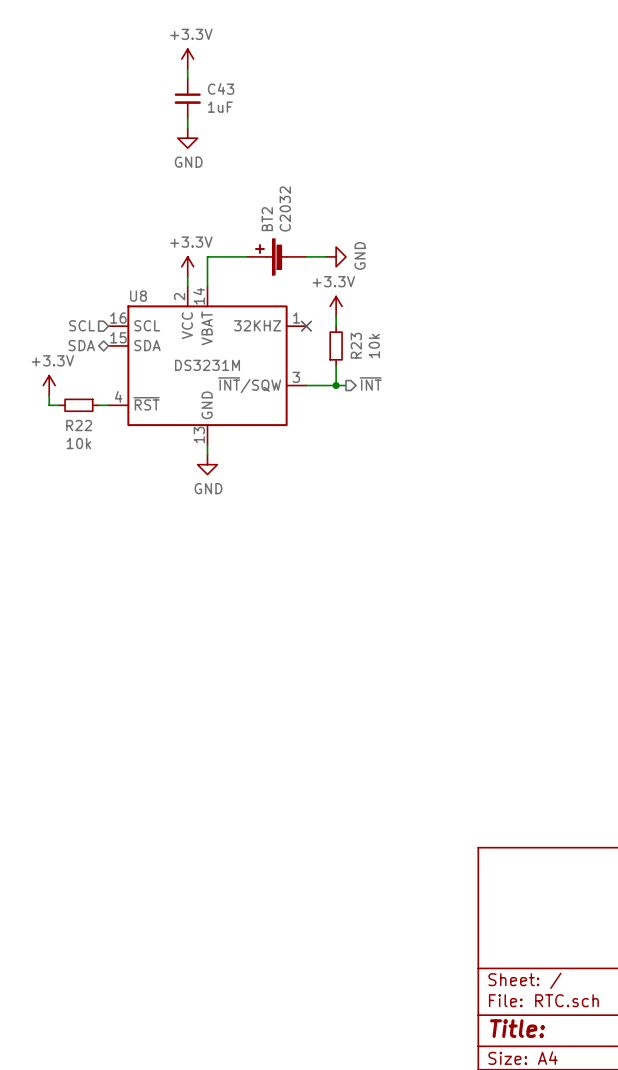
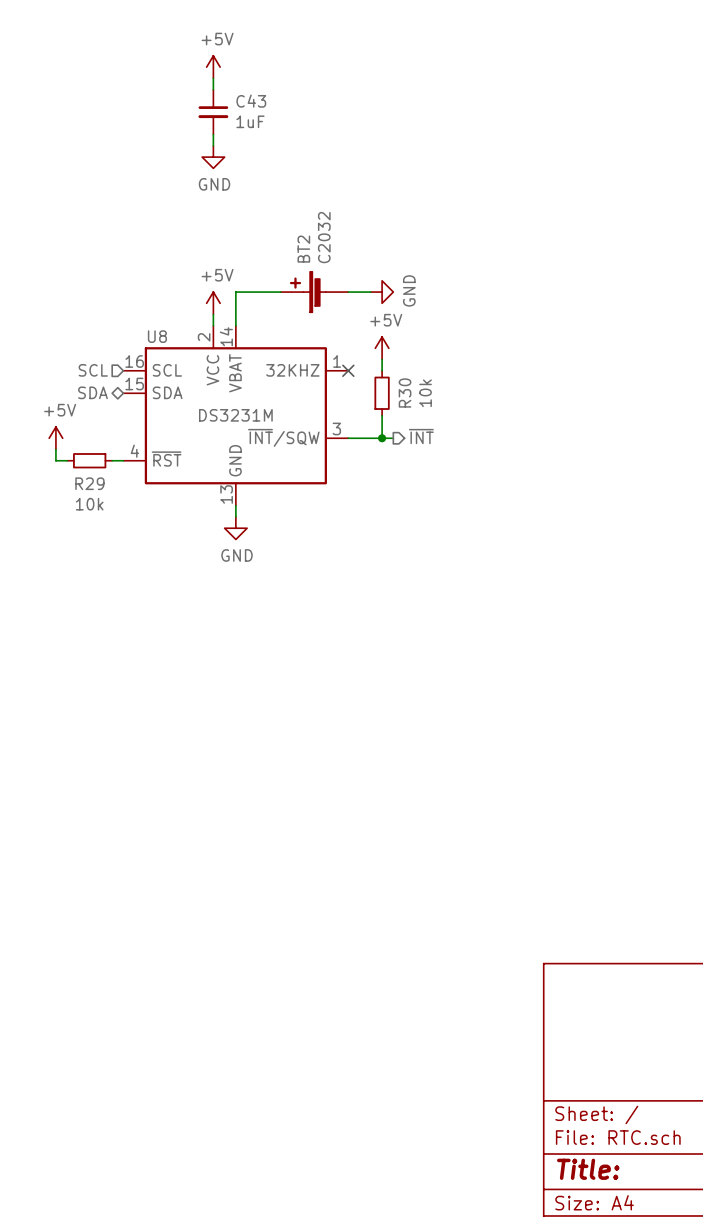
power symbol: +3.3V (187, 59) -> +5V (213, 67)
power symbol: +3.3V (187, 266) -> +5V (213, 303)
power symbol: +3.3V (336, 306) -> +5V (382, 348)
R23 name: R23 (356, 345) -> R30 (405, 393)
power symbol: +3.3V (49, 385) -> +5V (55, 438)
R22 name: R22 (79, 425) -> R29 (89, 483)

